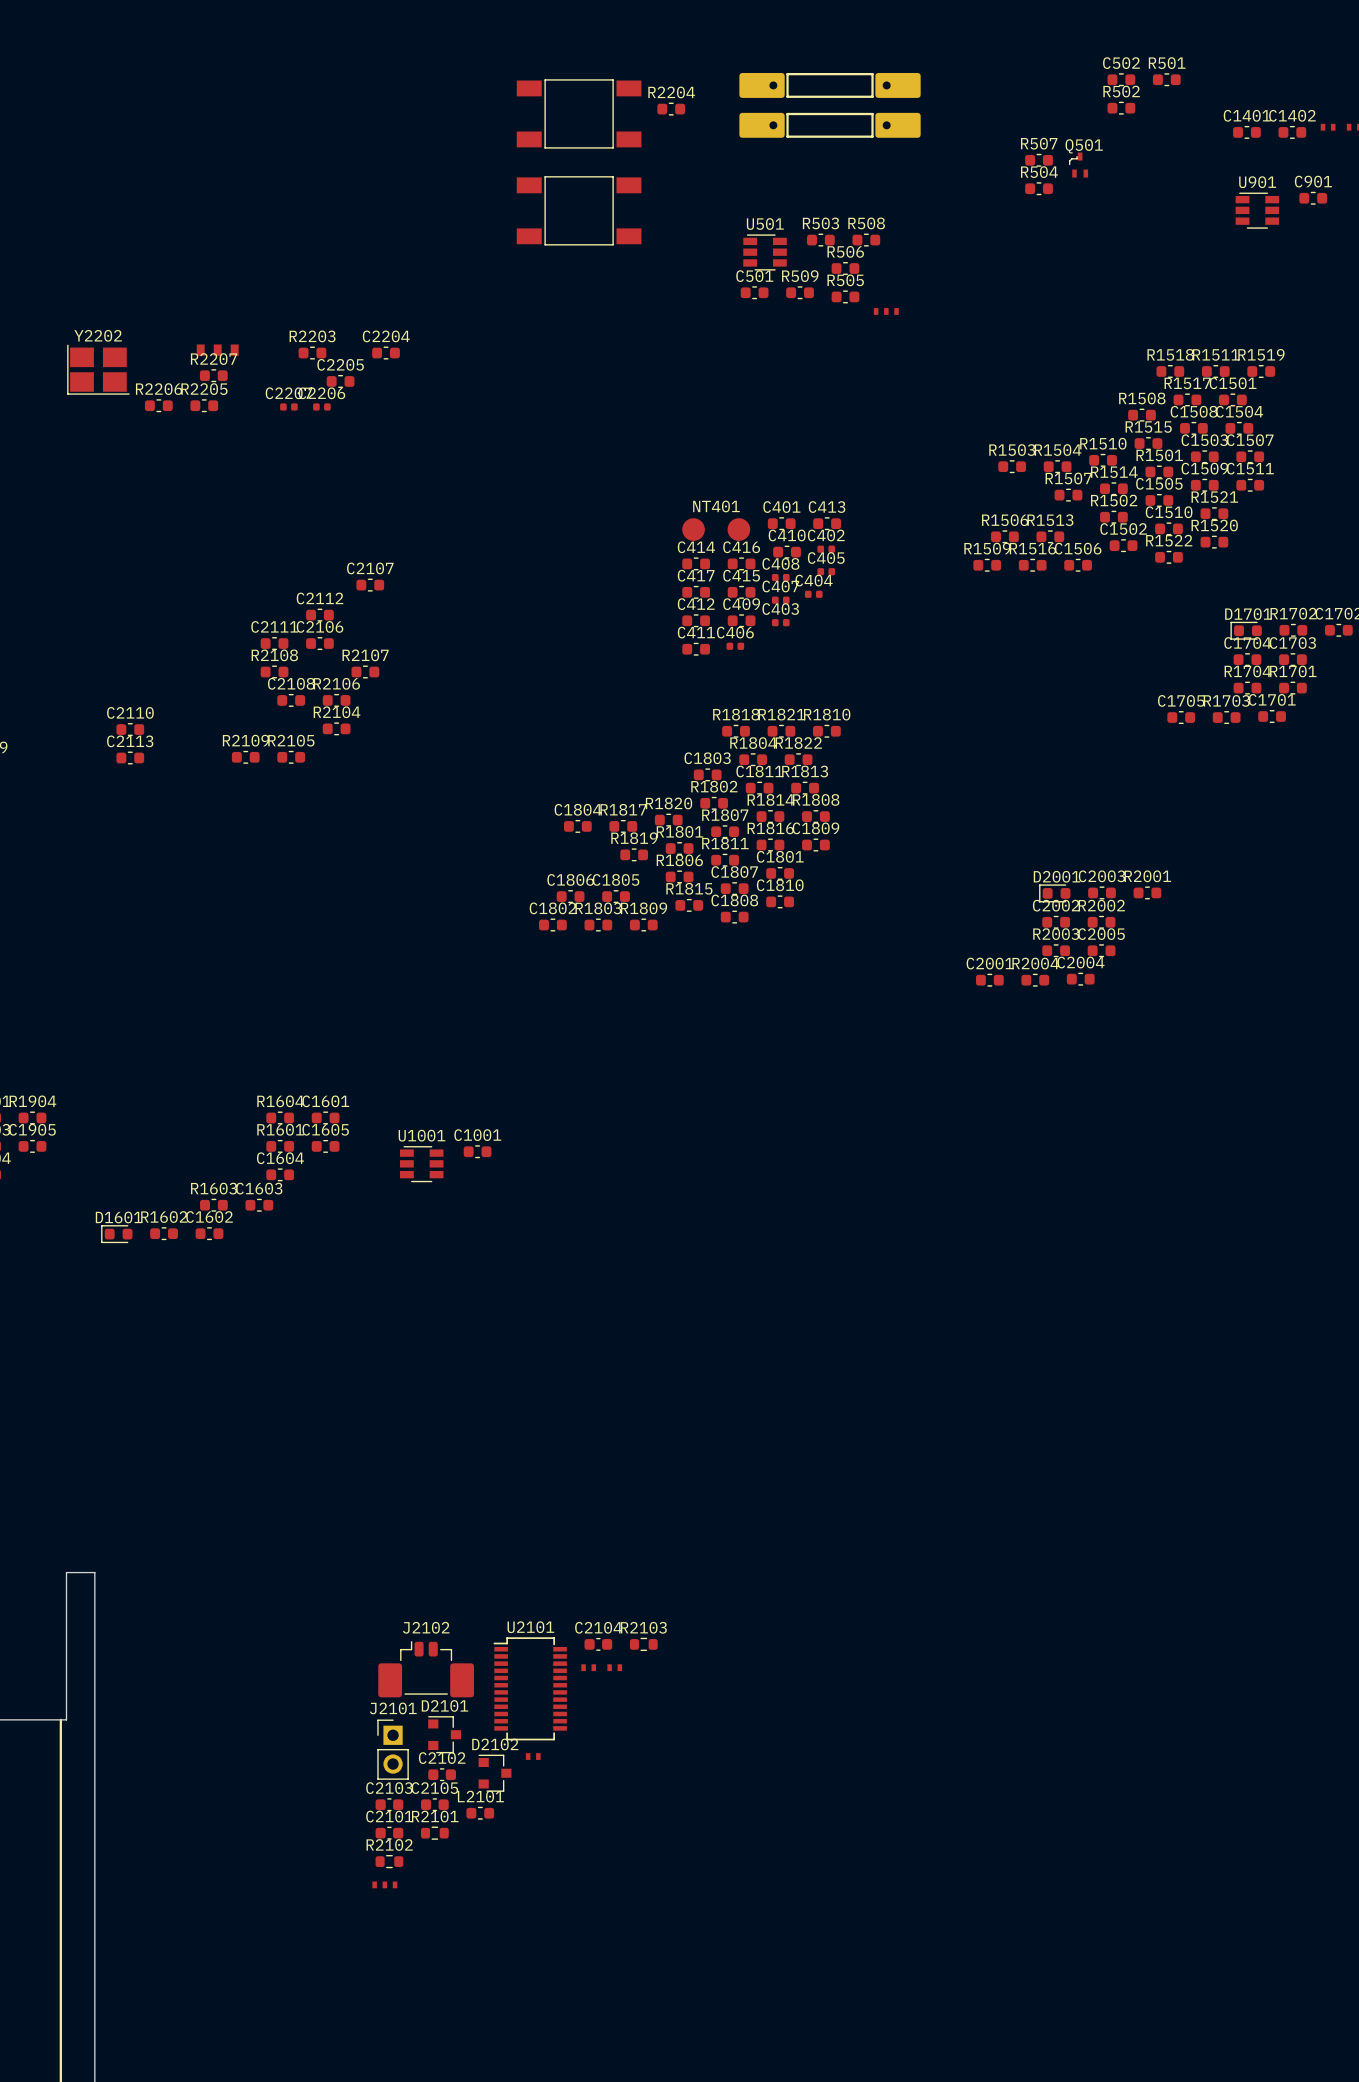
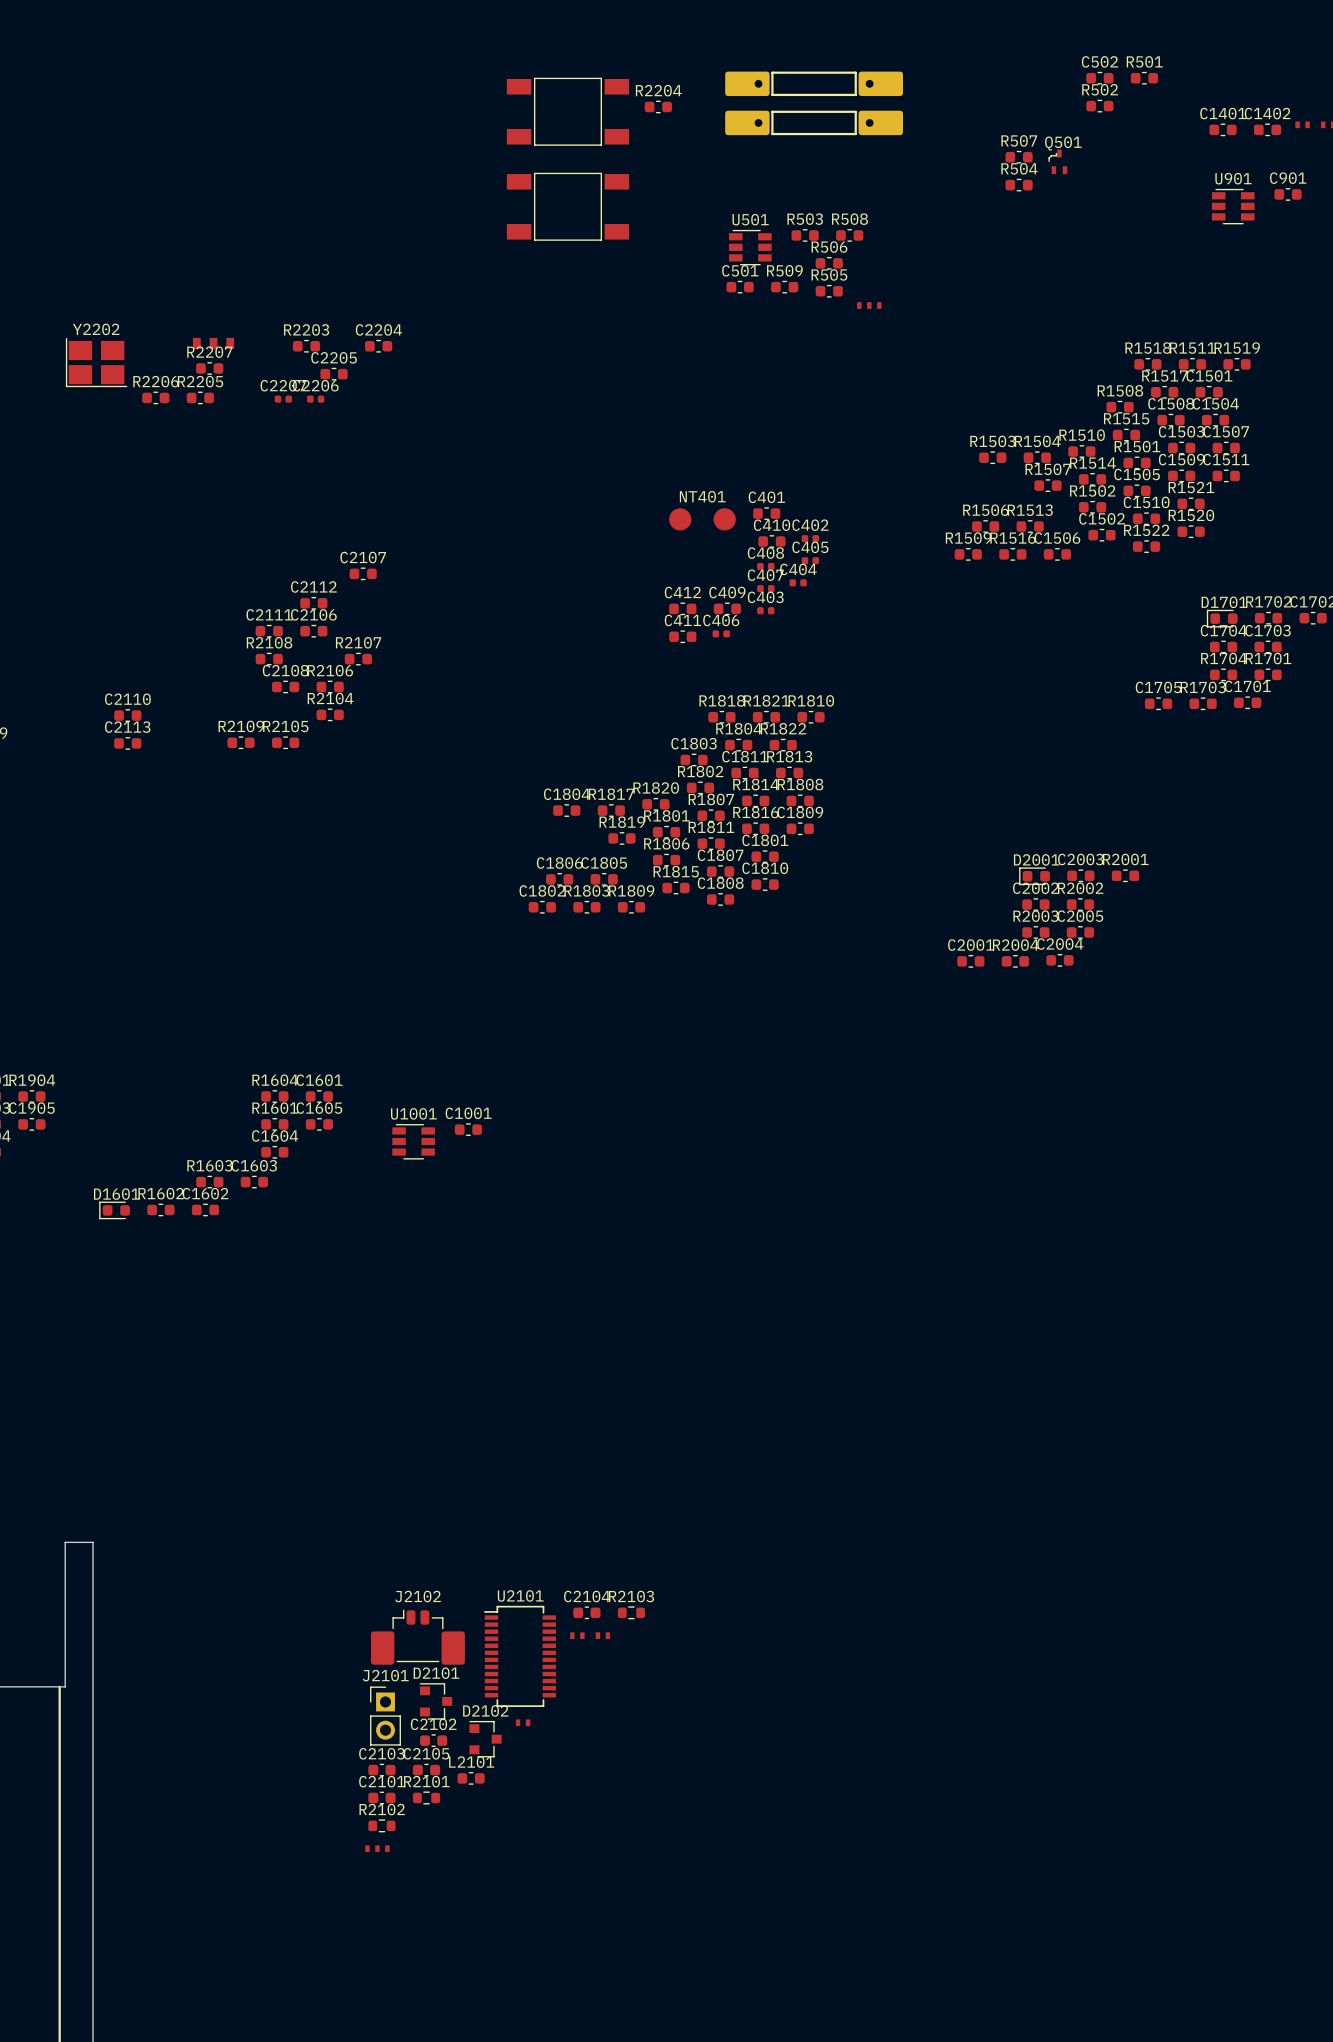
C413: (827, 523) -> none
C414: (696, 563) -> none
C416: (741, 563) -> none
C417: (696, 592) -> none
C415: (741, 592) -> none

